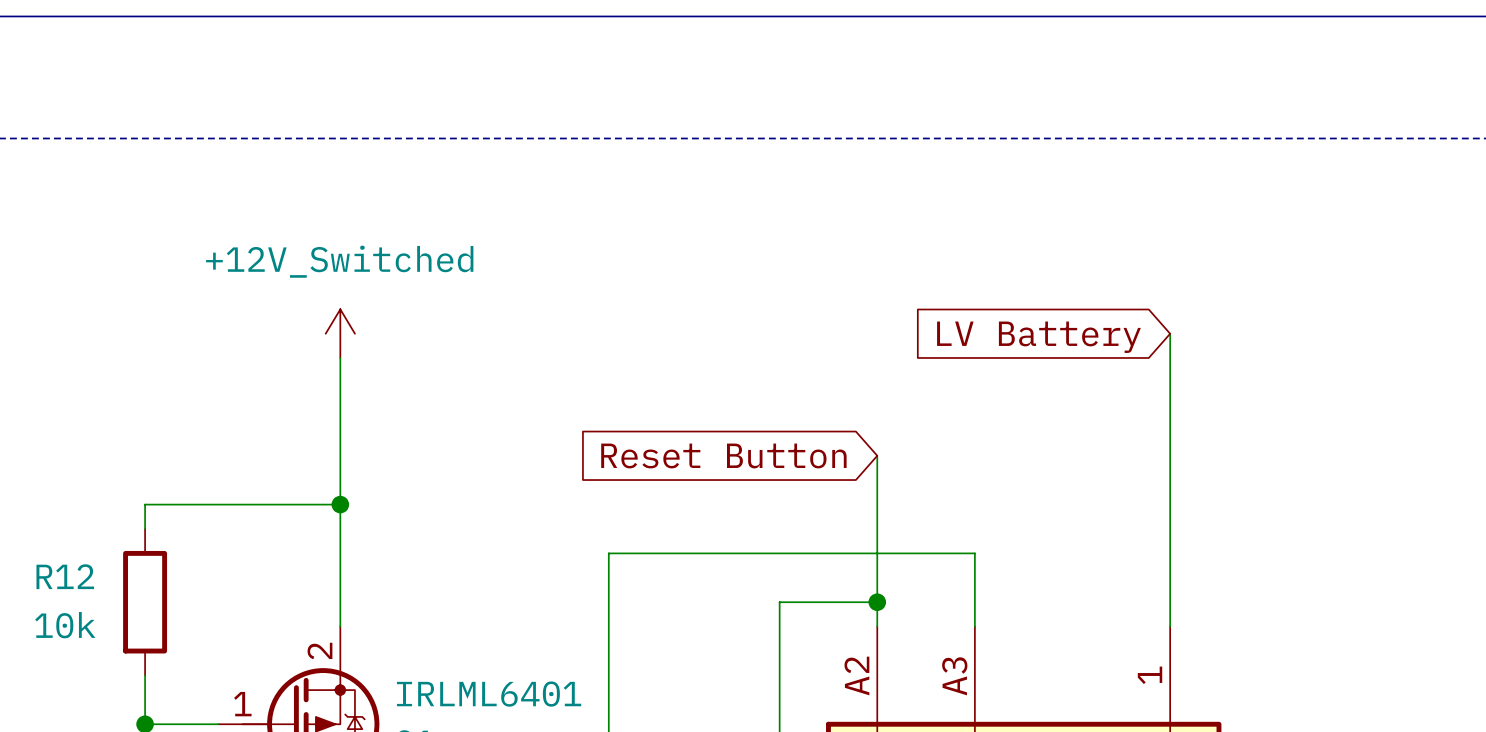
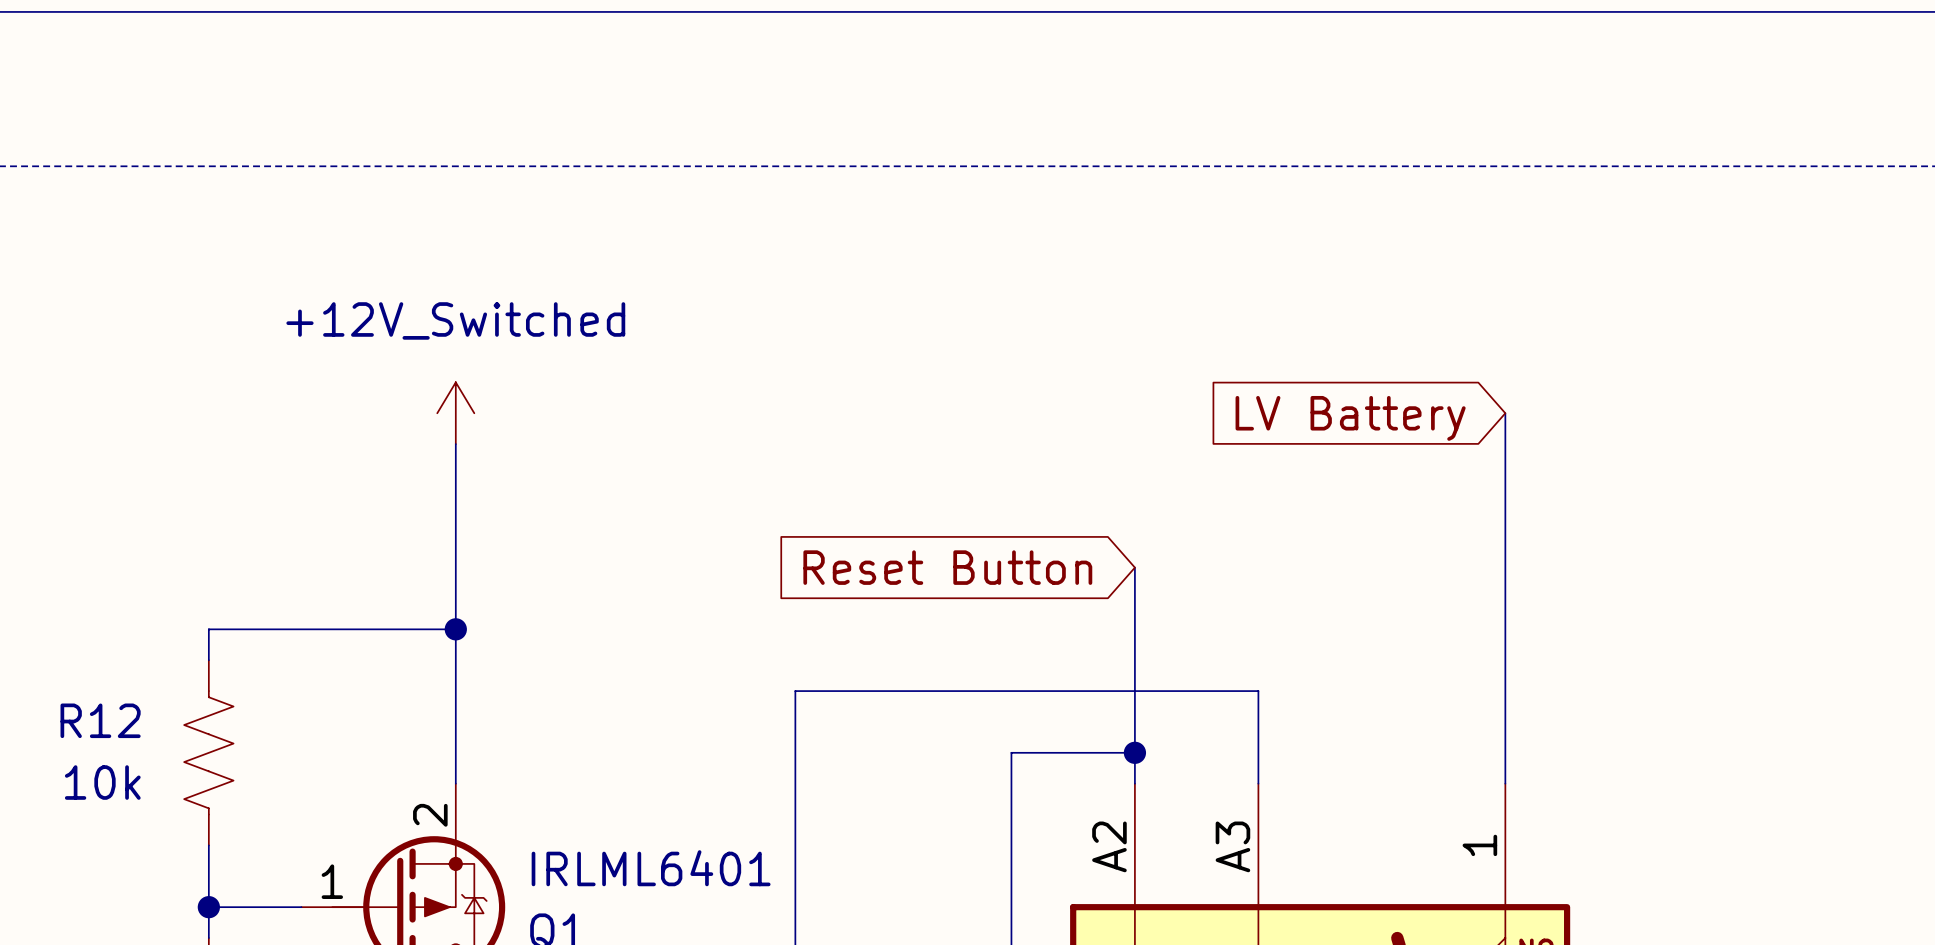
R12 symbol: [123, 528, 168, 676] -> [184, 660, 234, 846]

